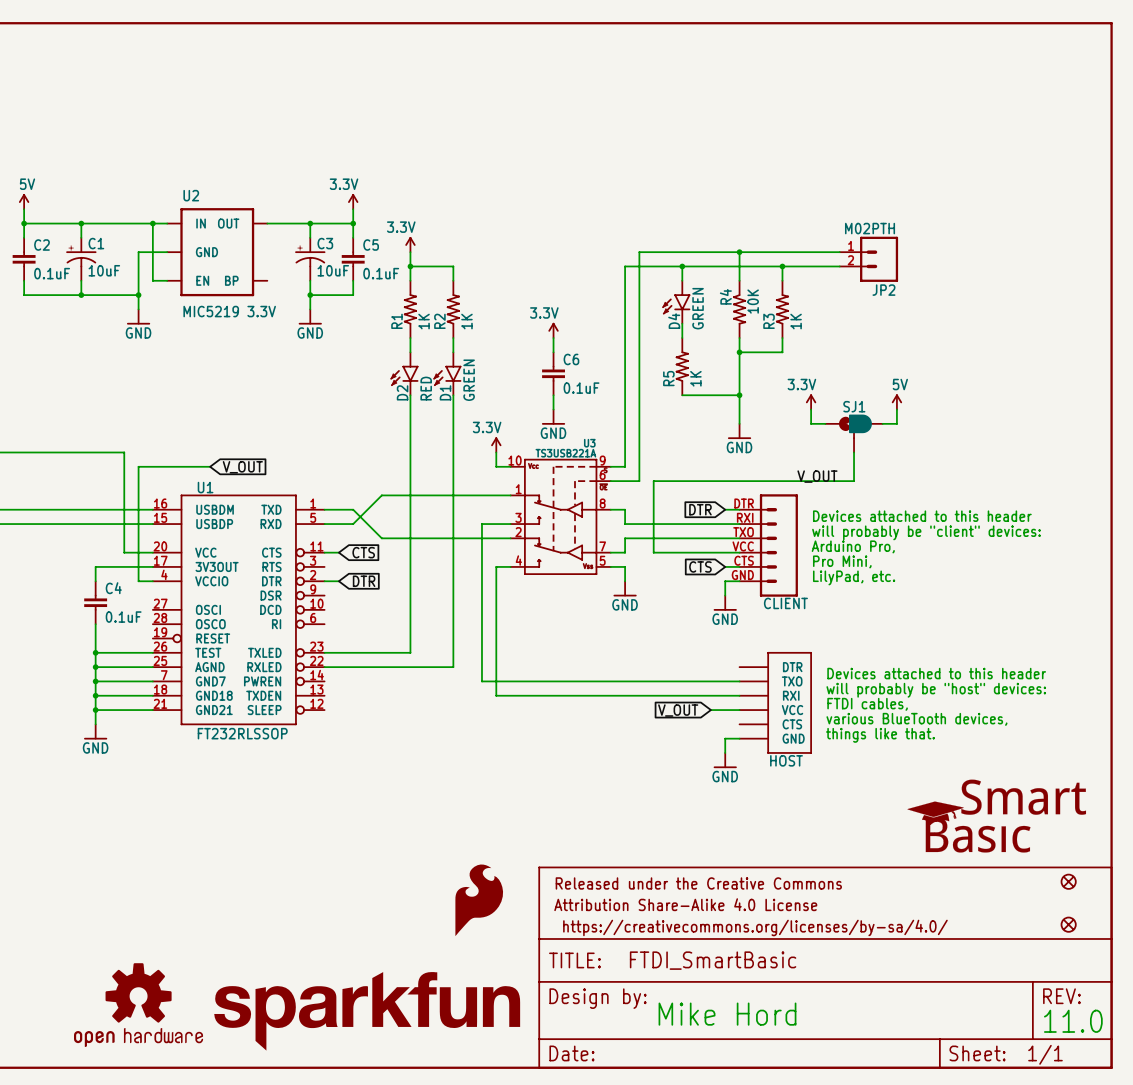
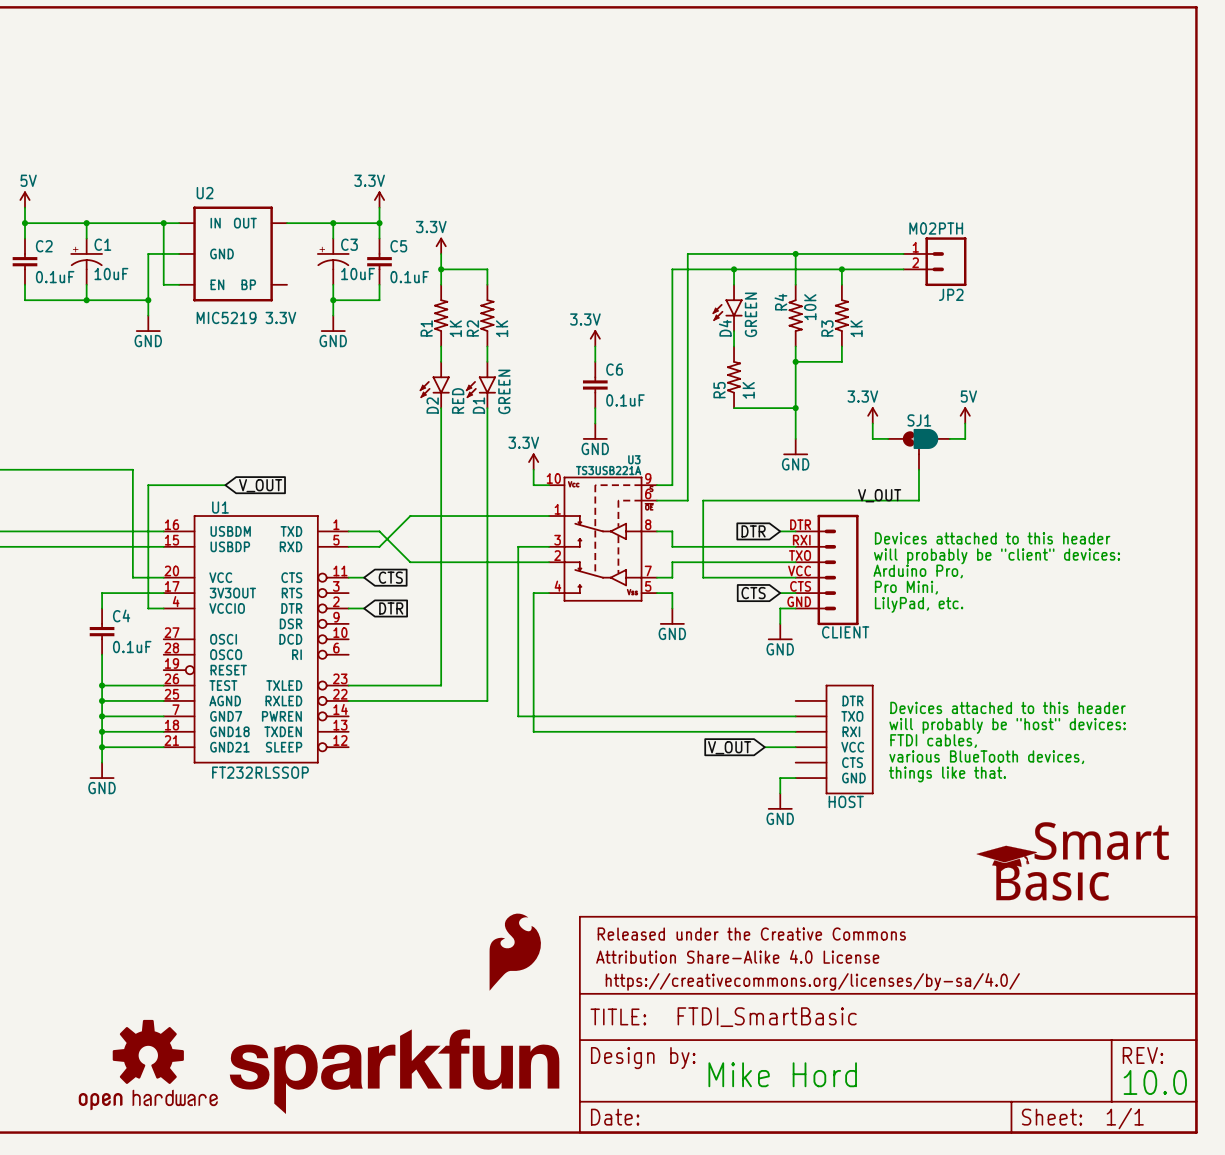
part: (1068, 881) -> none
part: (1068, 924) -> none
text: 11.0 (1073, 1021) -> 10.0 (1155, 1082)

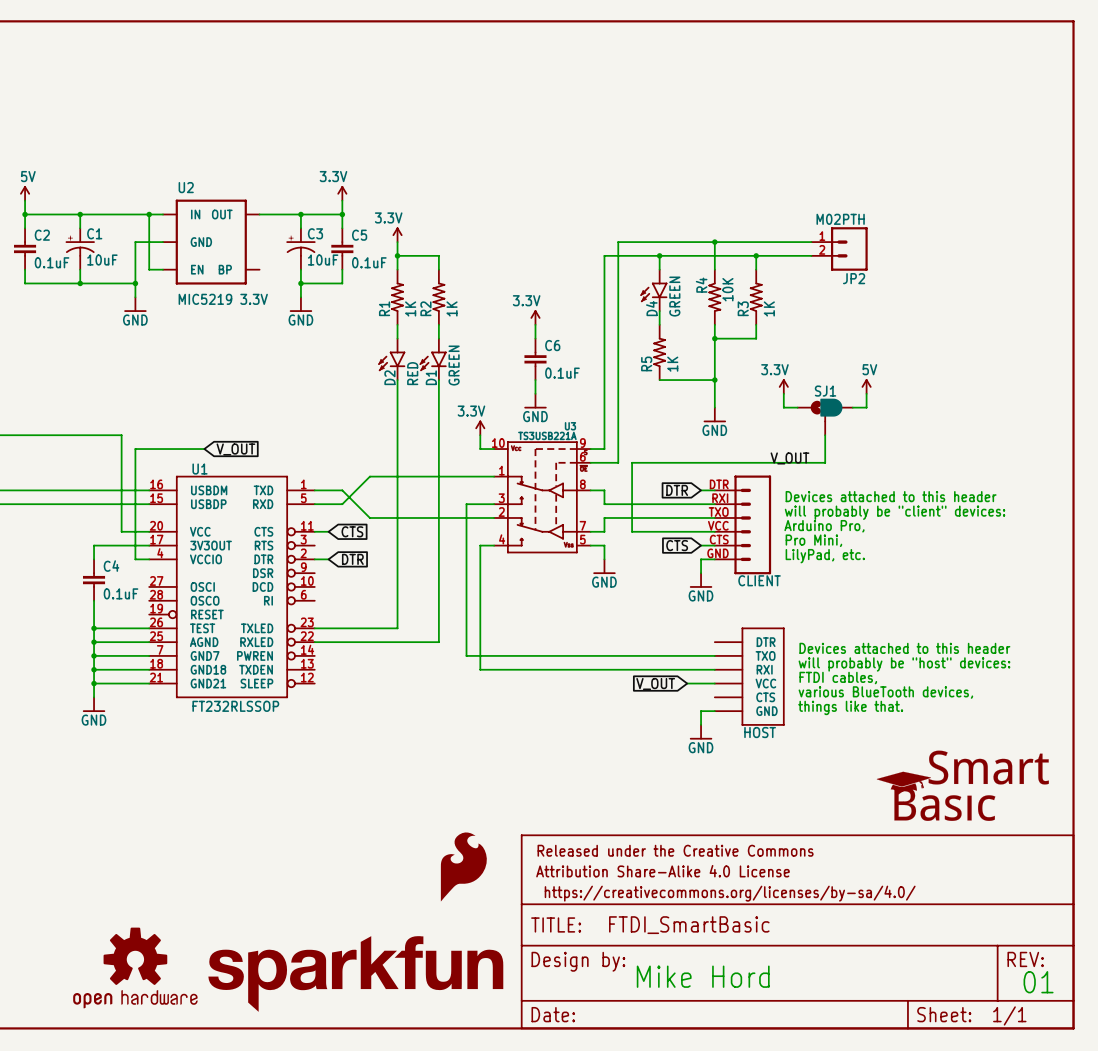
text: none -> 01 (1038, 982)
text: 10.0 (1155, 1082) -> none

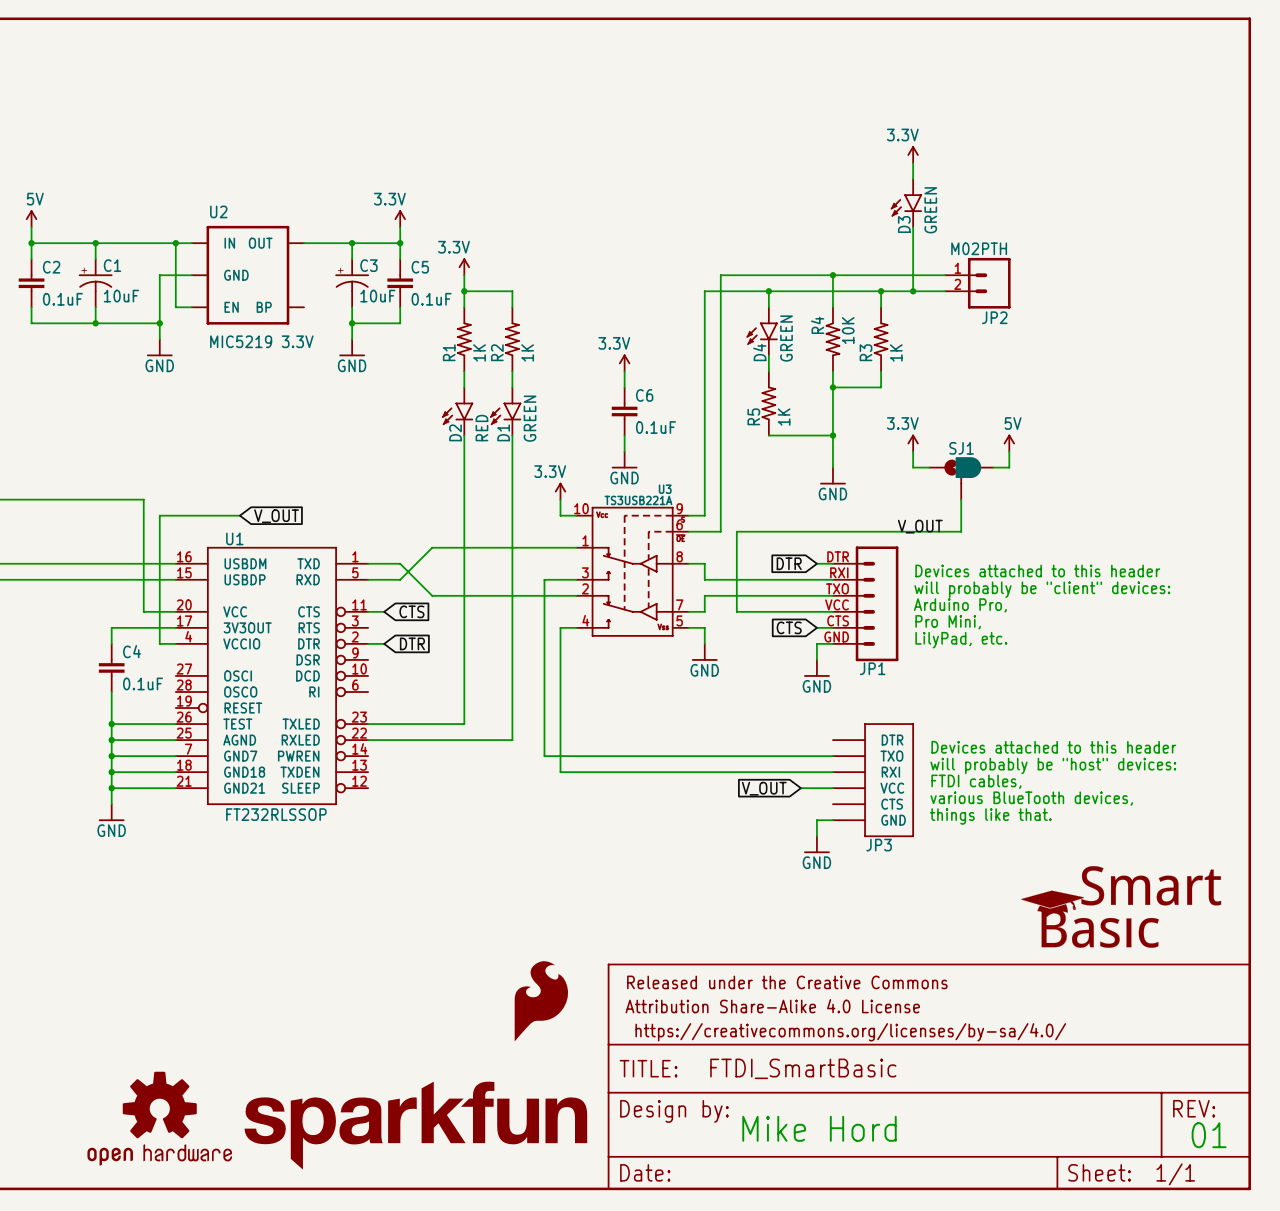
power symbol: none -> 3.3V (913, 154)
wire: none -> (913, 163) (913, 179)
D3: none -> GREEN (906, 203)
wire: none -> (913, 227) (913, 291)
junction: none -> (913, 291)
CLIENT name: CLIENT (759, 580) -> JP1 (872, 668)
HOST name: HOST (760, 732) -> JP3 (879, 845)

